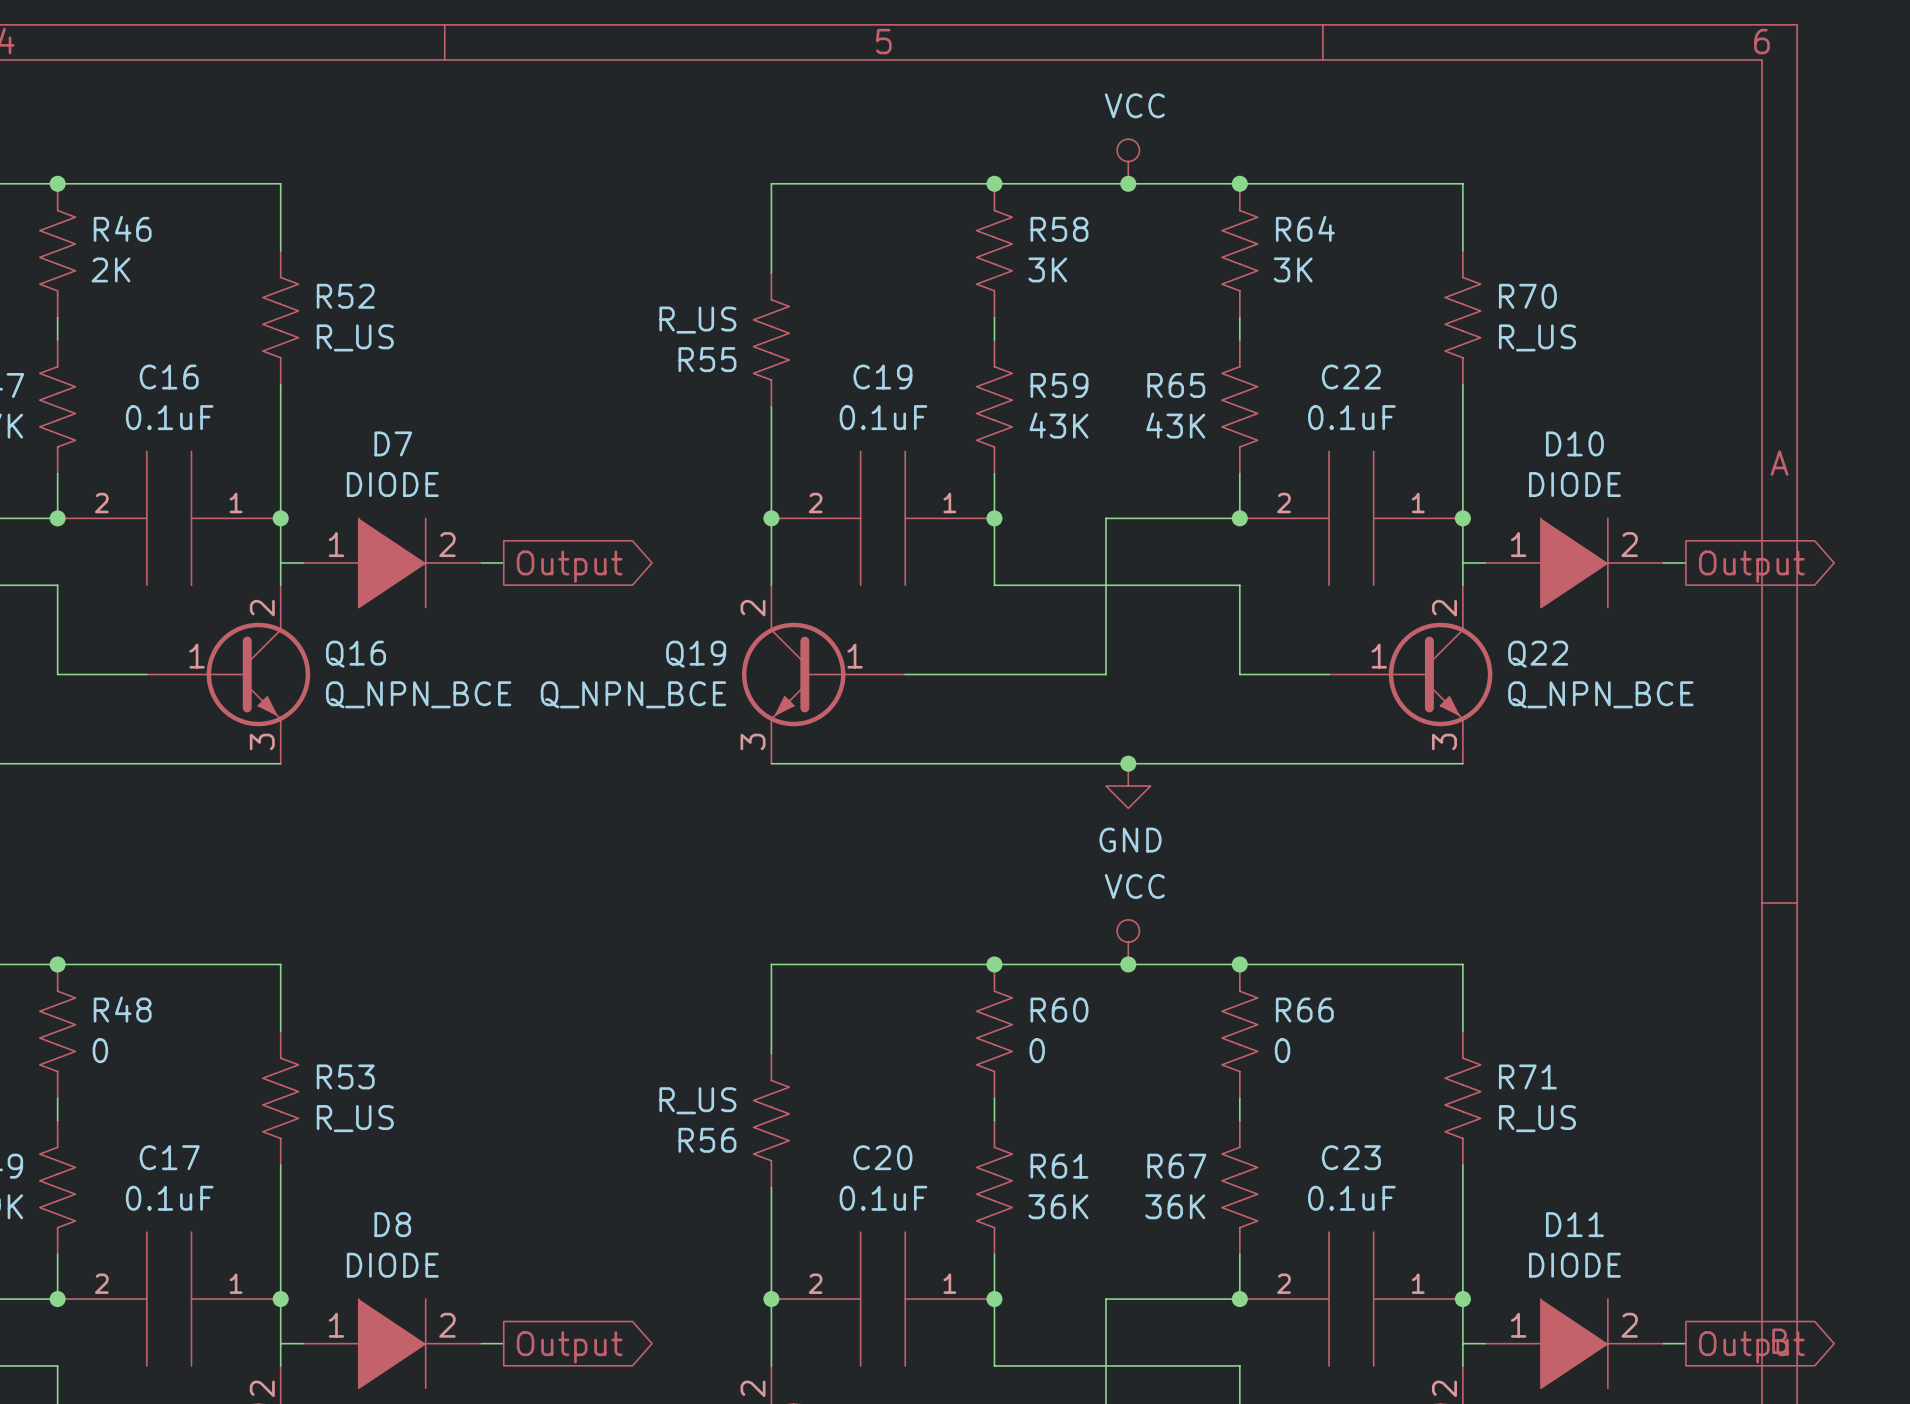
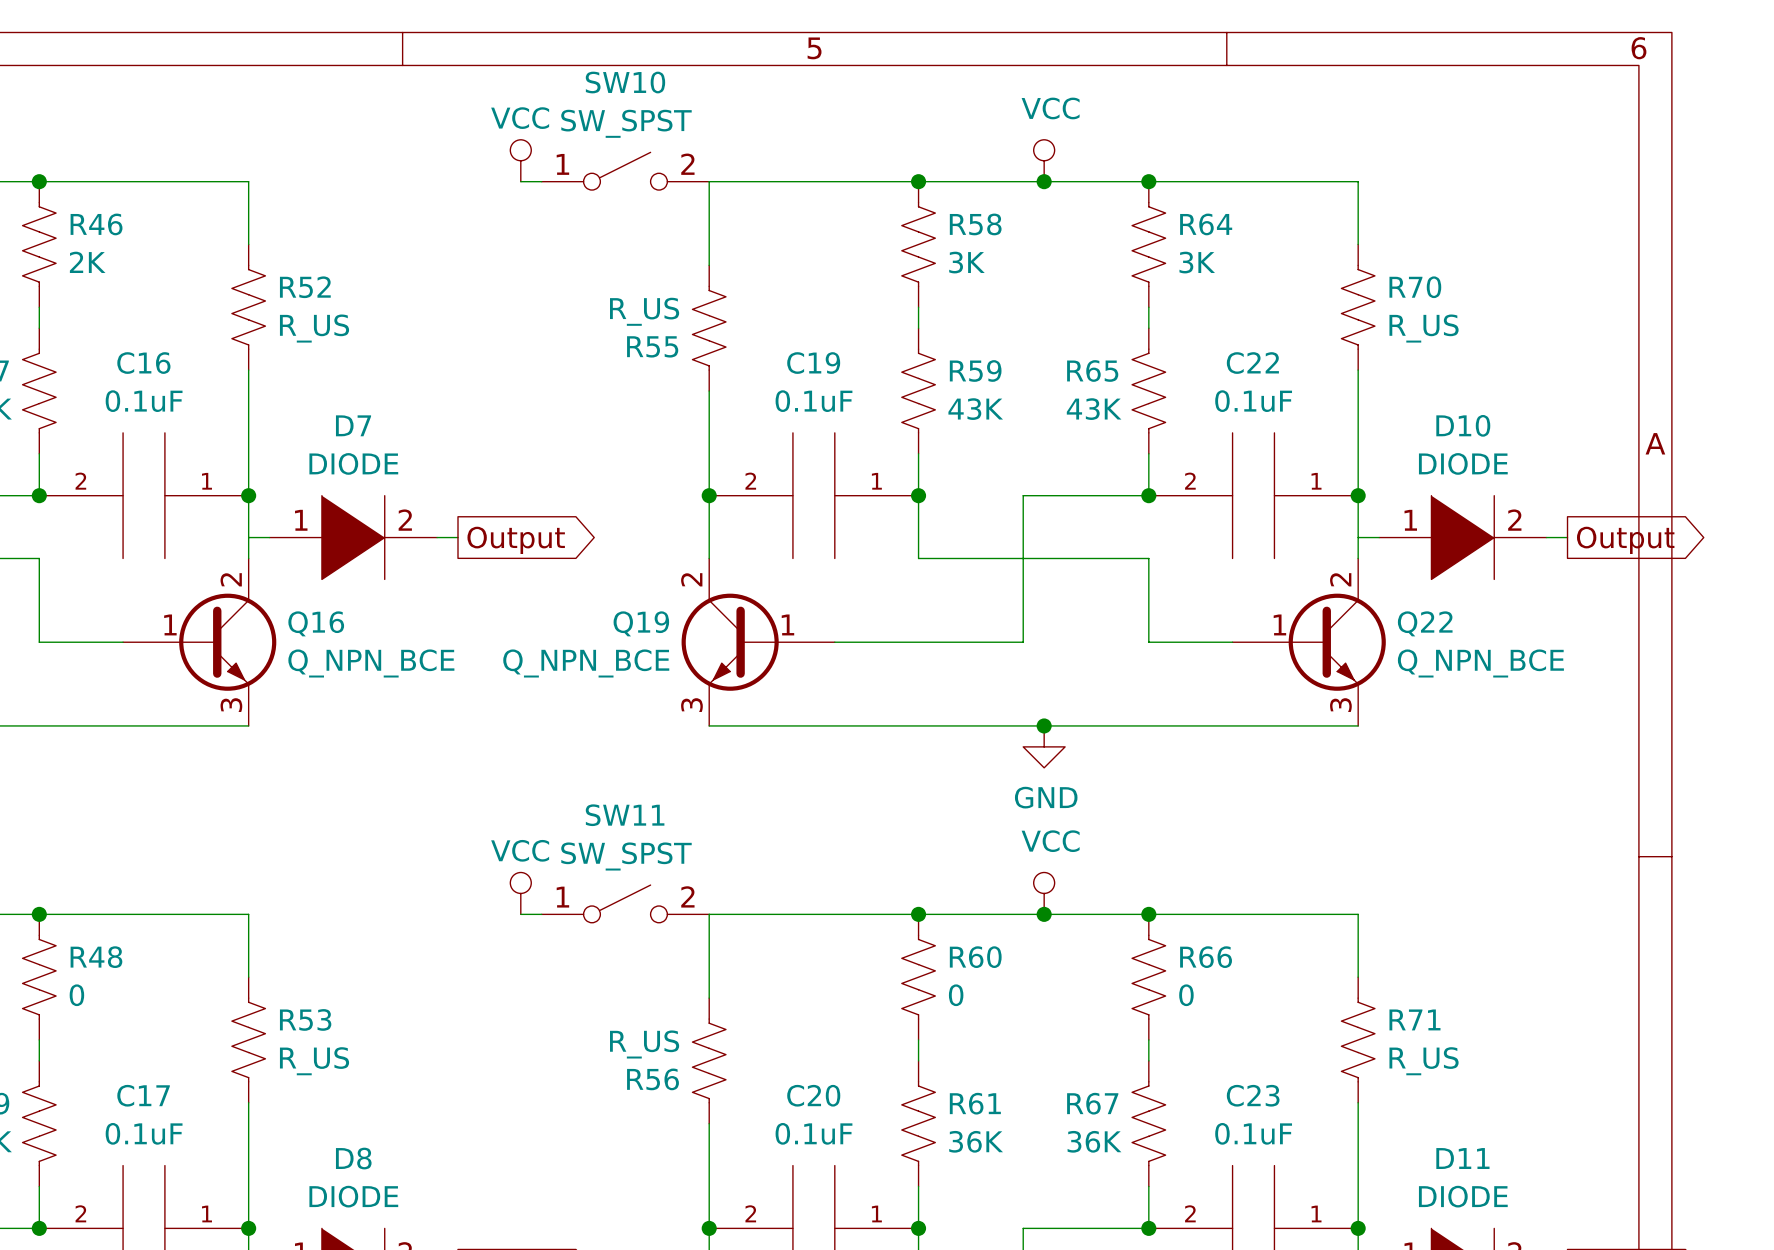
power symbol: none -> VCC (520, 160)
SW10: none -> SW_SPST (625, 171)
wire: none -> (520, 181) (541, 181)
power symbol: none -> VCC (520, 893)
SW11: none -> SW_SPST (625, 903)
wire: none -> (520, 914) (541, 914)

